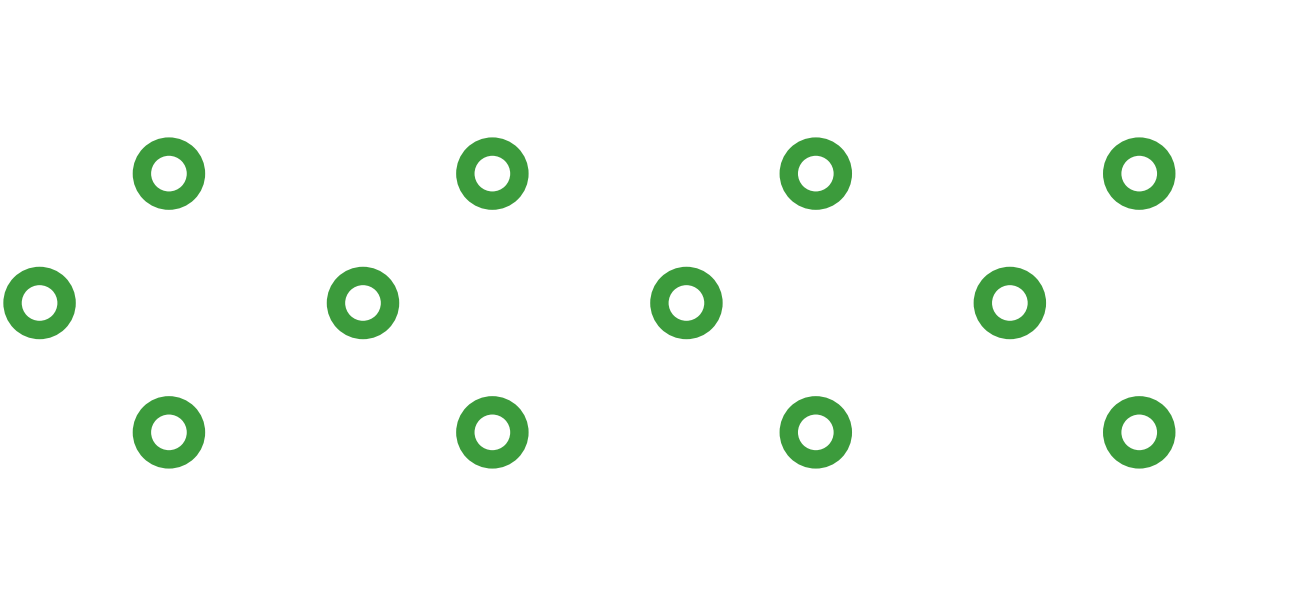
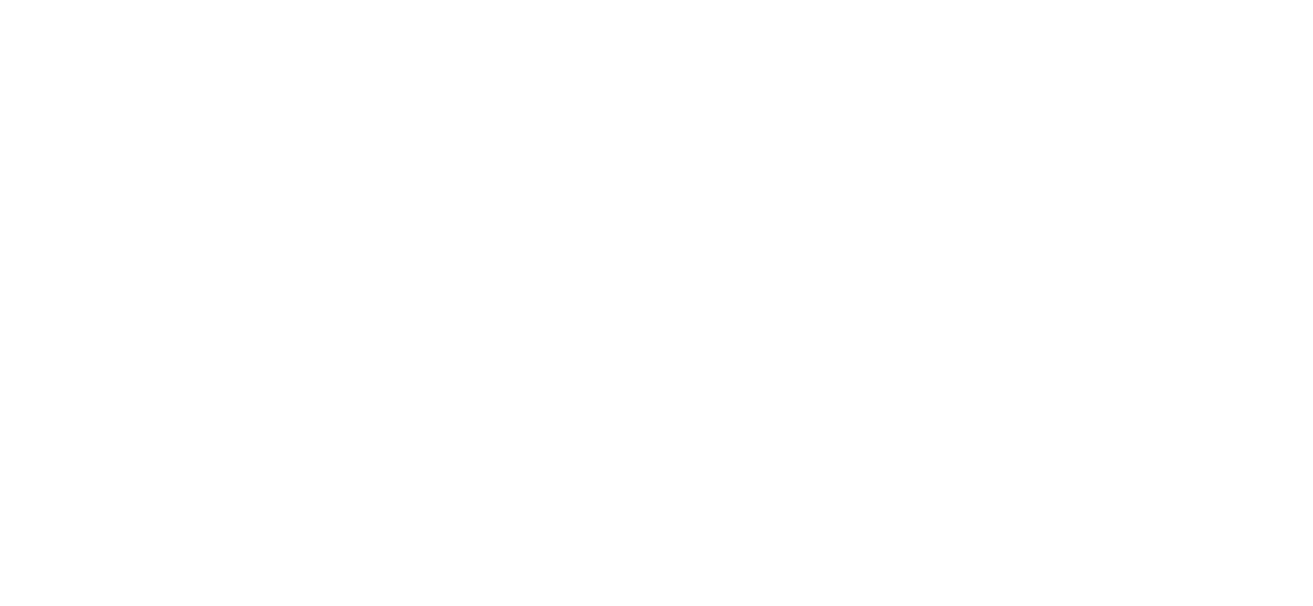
part: (104, 302) -> none
part: (427, 302) -> none
part: (751, 302) -> none
part: (1074, 302) -> none

